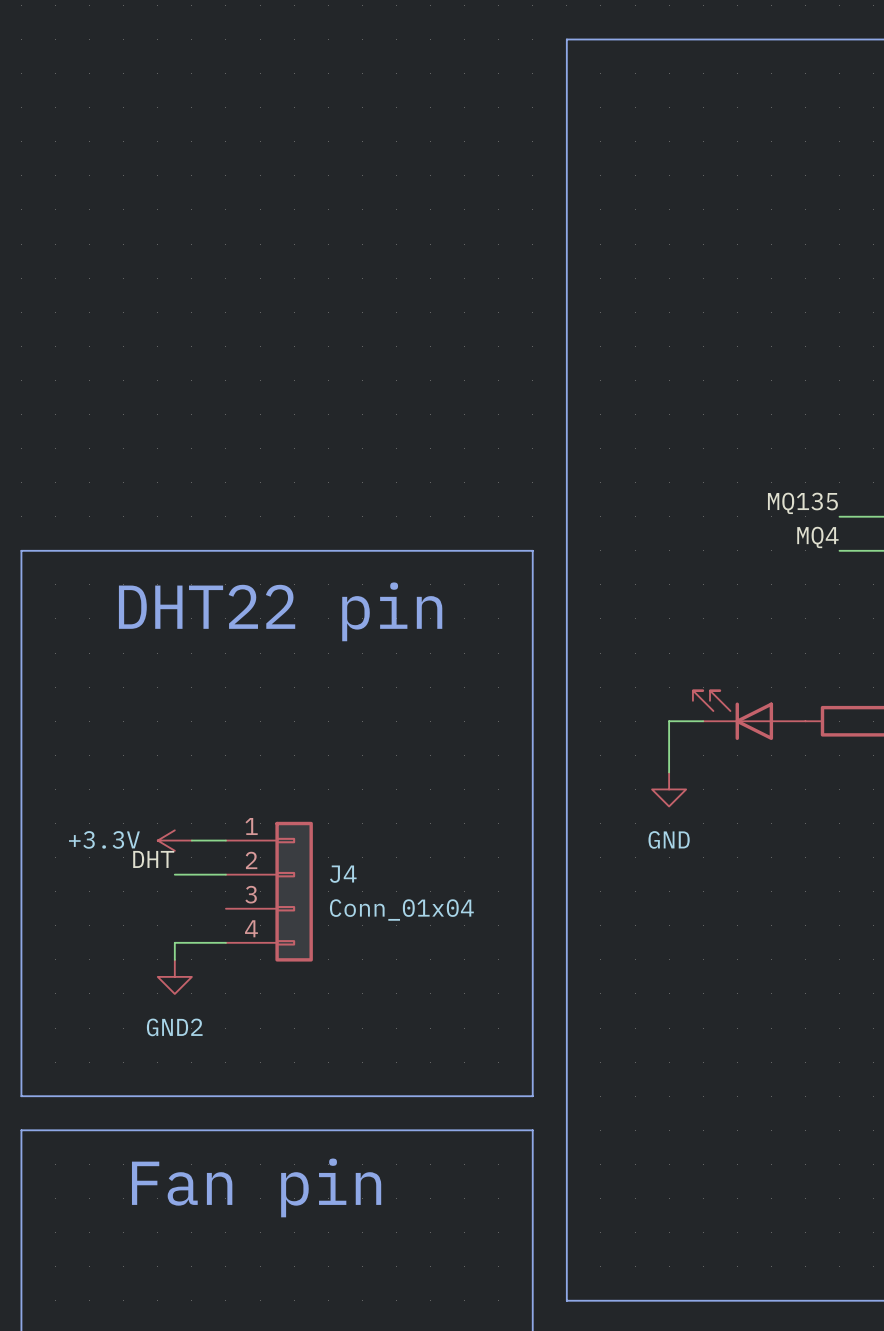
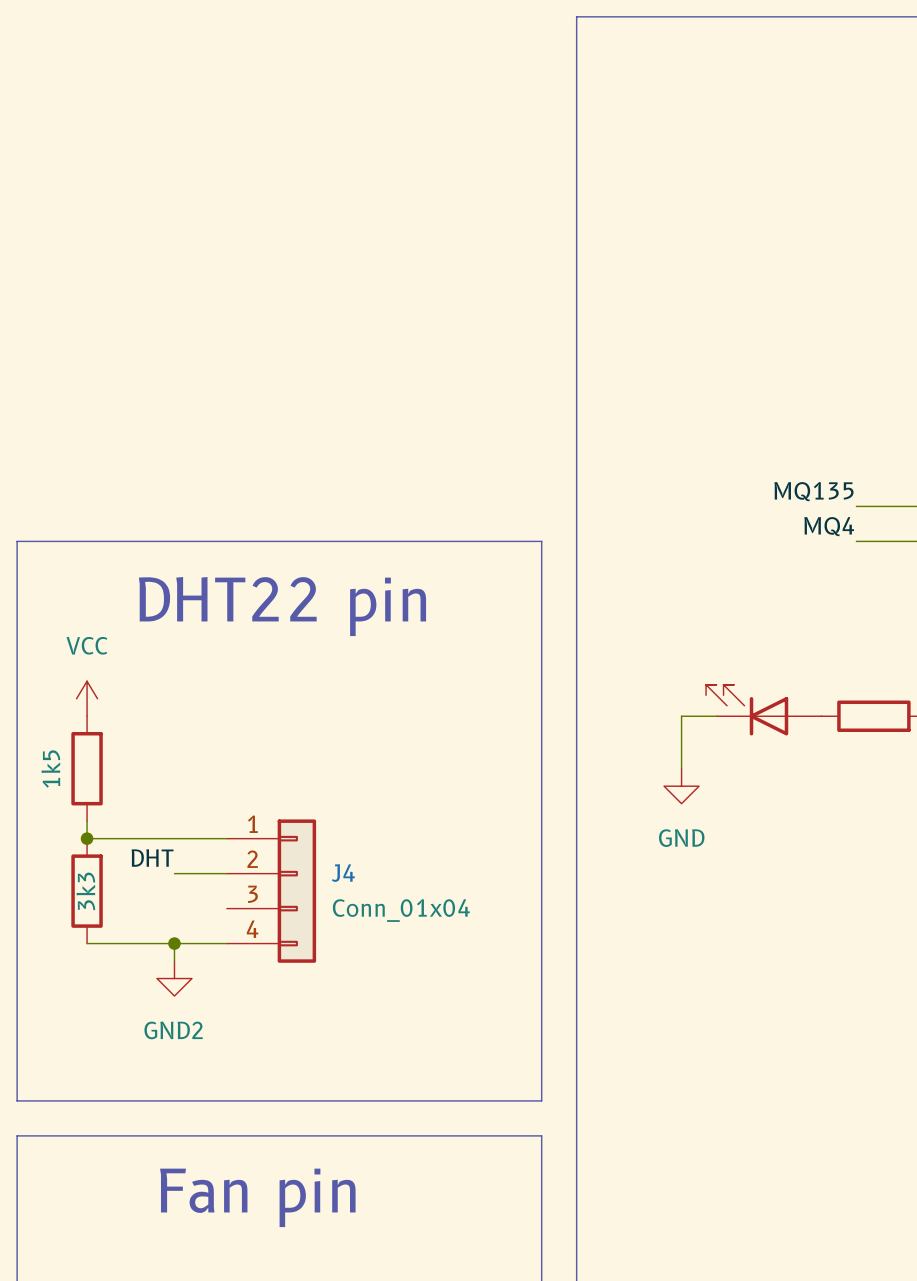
power symbol: none -> VCC (87, 698)
part: none -> 1k5 (87, 768)
wire: none -> (87, 821) (87, 838) (191, 838)
junction: none -> (87, 838)
power symbol: +3.3V (174, 840) -> none
part: none -> 3k3 (87, 891)
wire: none -> (87, 943) (174, 943)
junction: none -> (174, 943)

